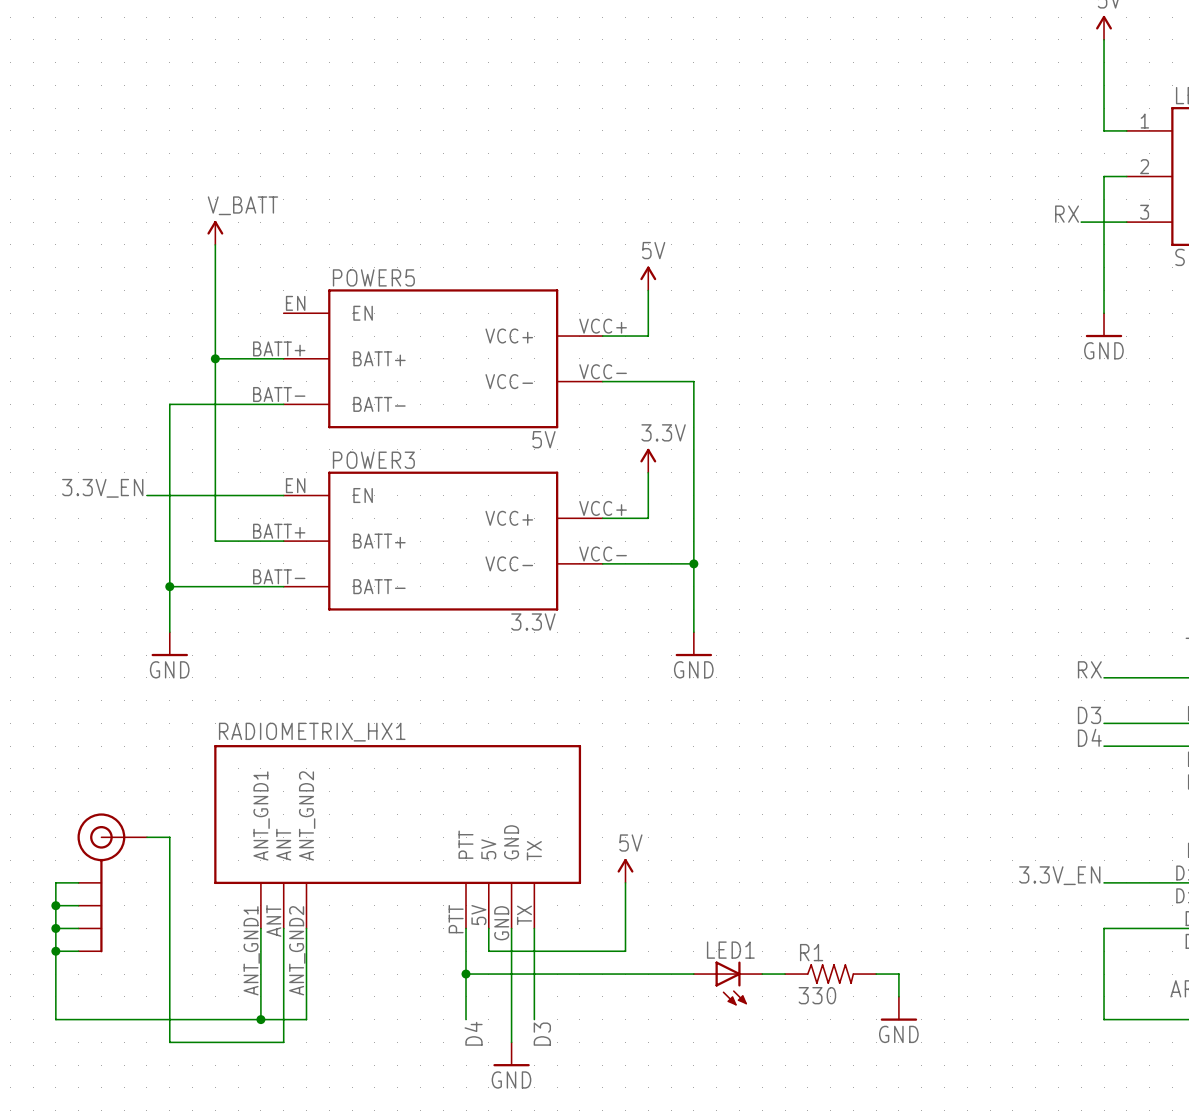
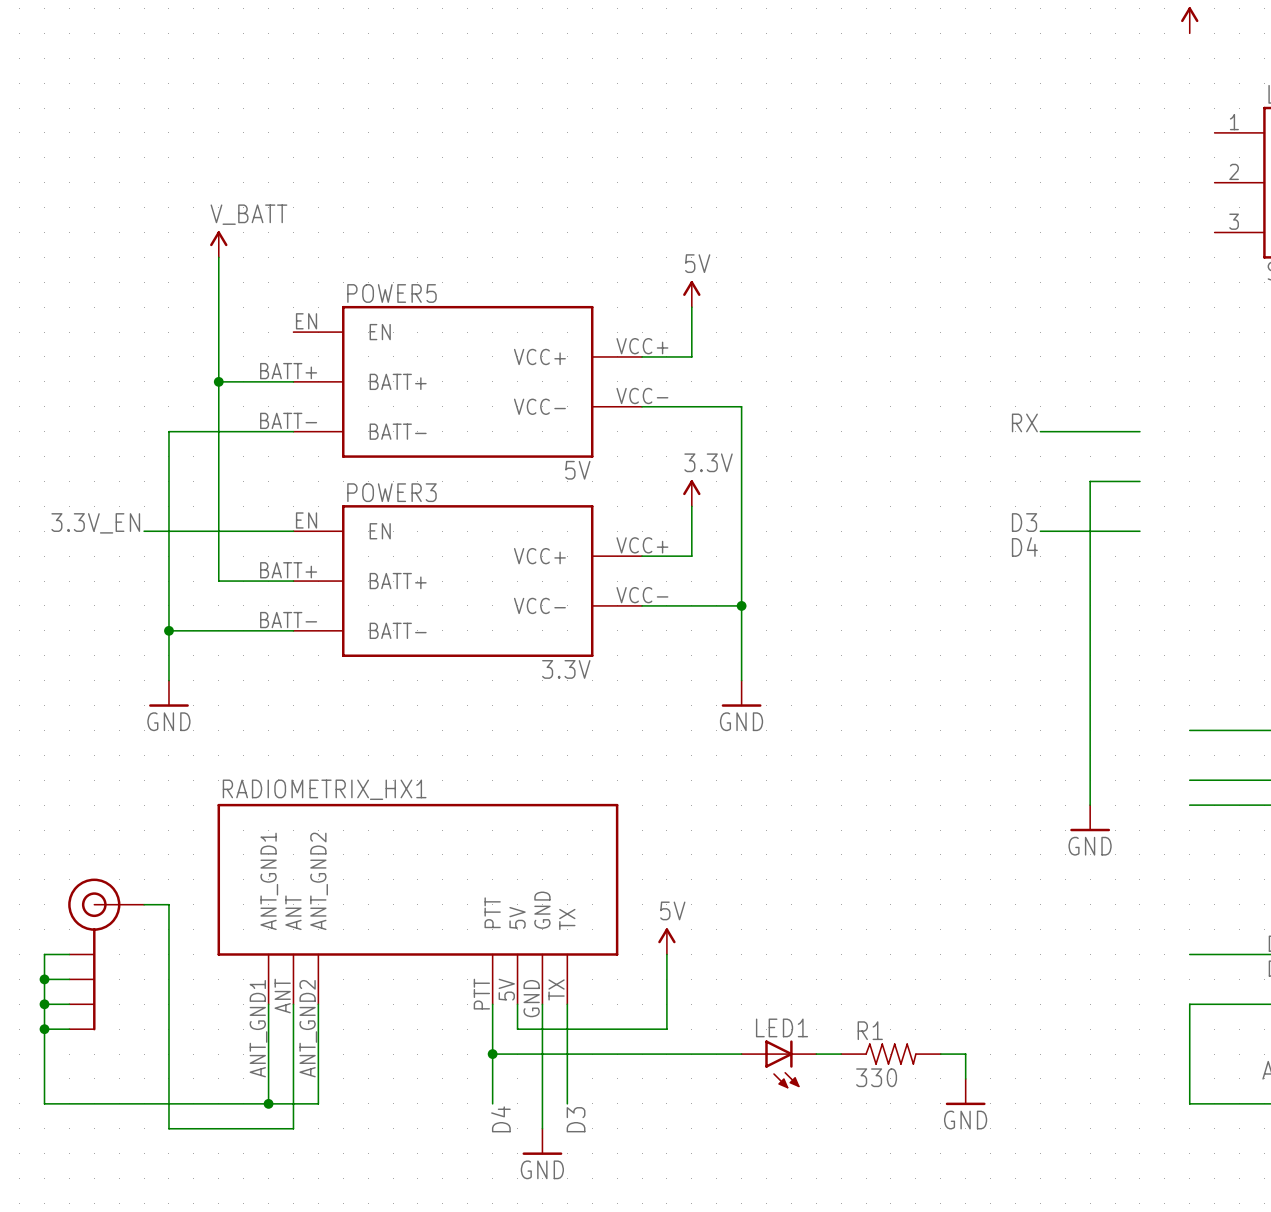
wire: (1104, 39) (1104, 130) (1126, 130) -> none
wire: (1126, 176) (1104, 176) (1104, 313) -> none
label: RX (1067, 214) -> none
wire: (1081, 222) (1126, 222) -> none
power symbol: GND (1104, 325) -> none
label: none -> RX (1024, 422)
wire: none -> (1040, 431) (1139, 431)
wire: none -> (1139, 481) (1090, 481) (1090, 805)
label: none -> D3 (1024, 522)
wire: none -> (1040, 531) (1139, 531)
label: none -> D4 (1024, 547)
label: RX (1089, 669) -> none
label: D3 (1089, 715) -> none
label: D4 (1089, 737) -> none
power symbol: none -> GND (1090, 818)
label: 3.3V_EN (1059, 875) -> none

